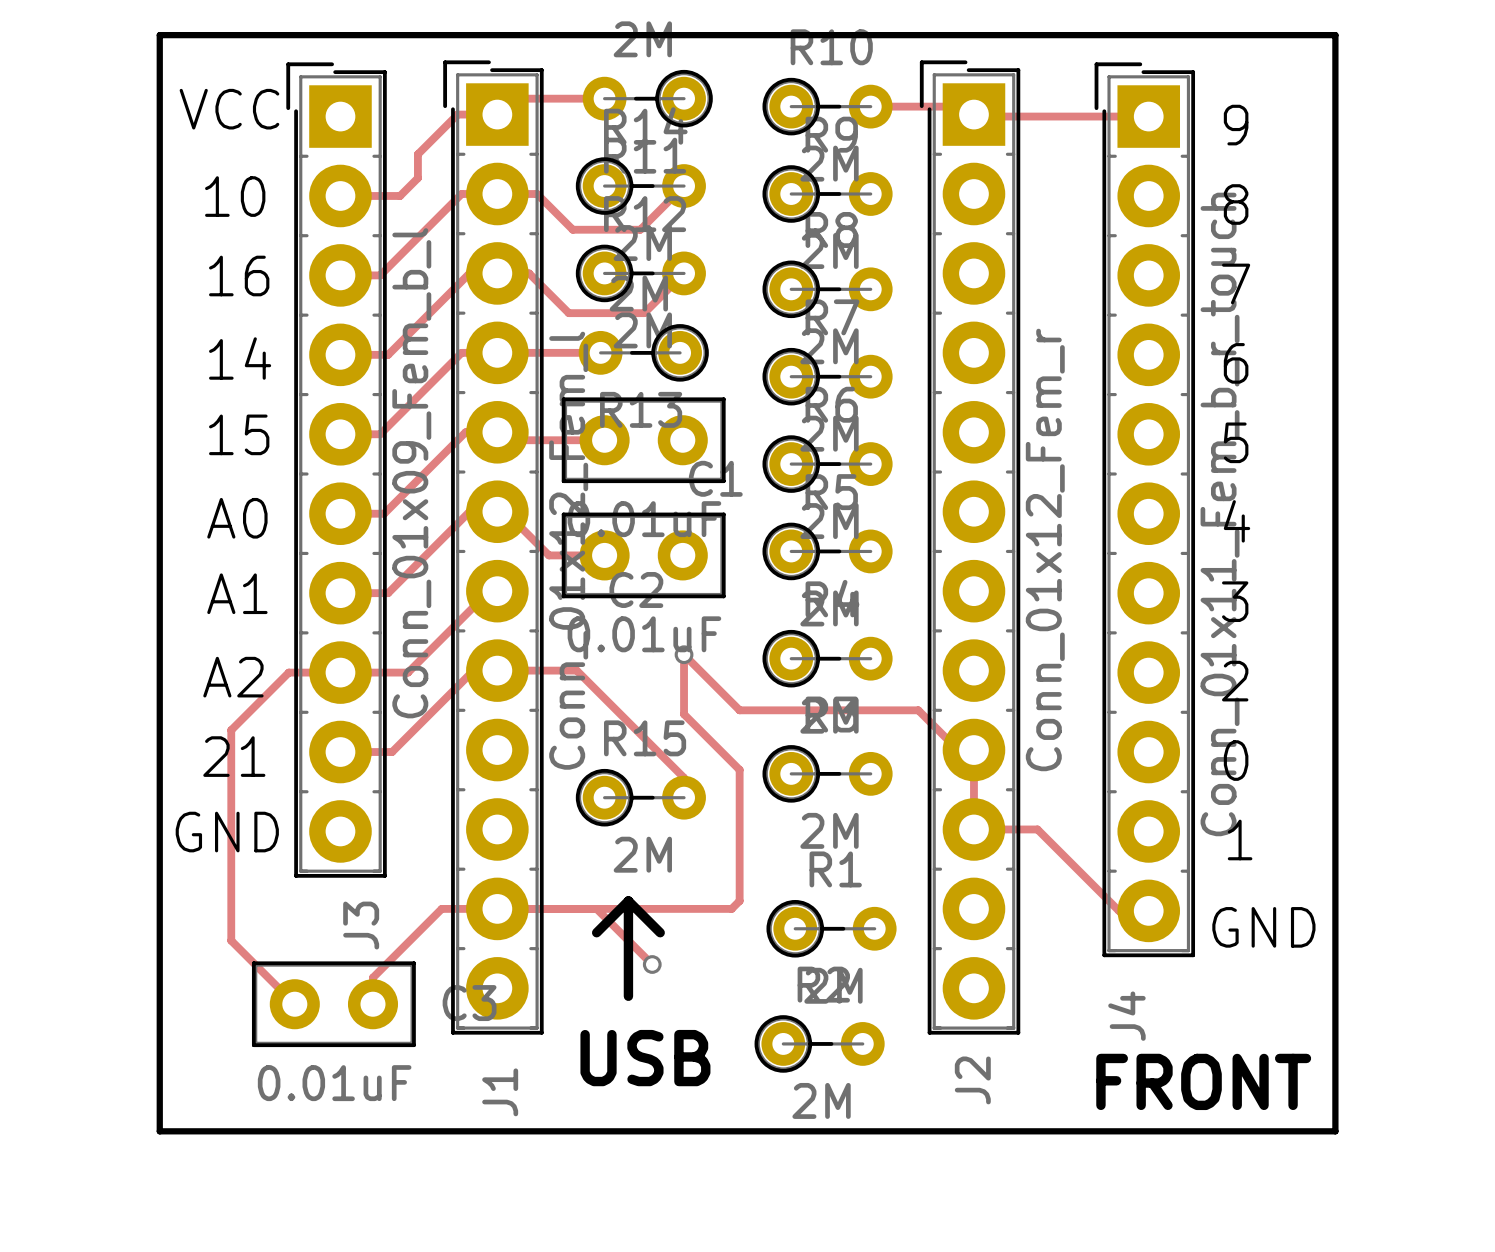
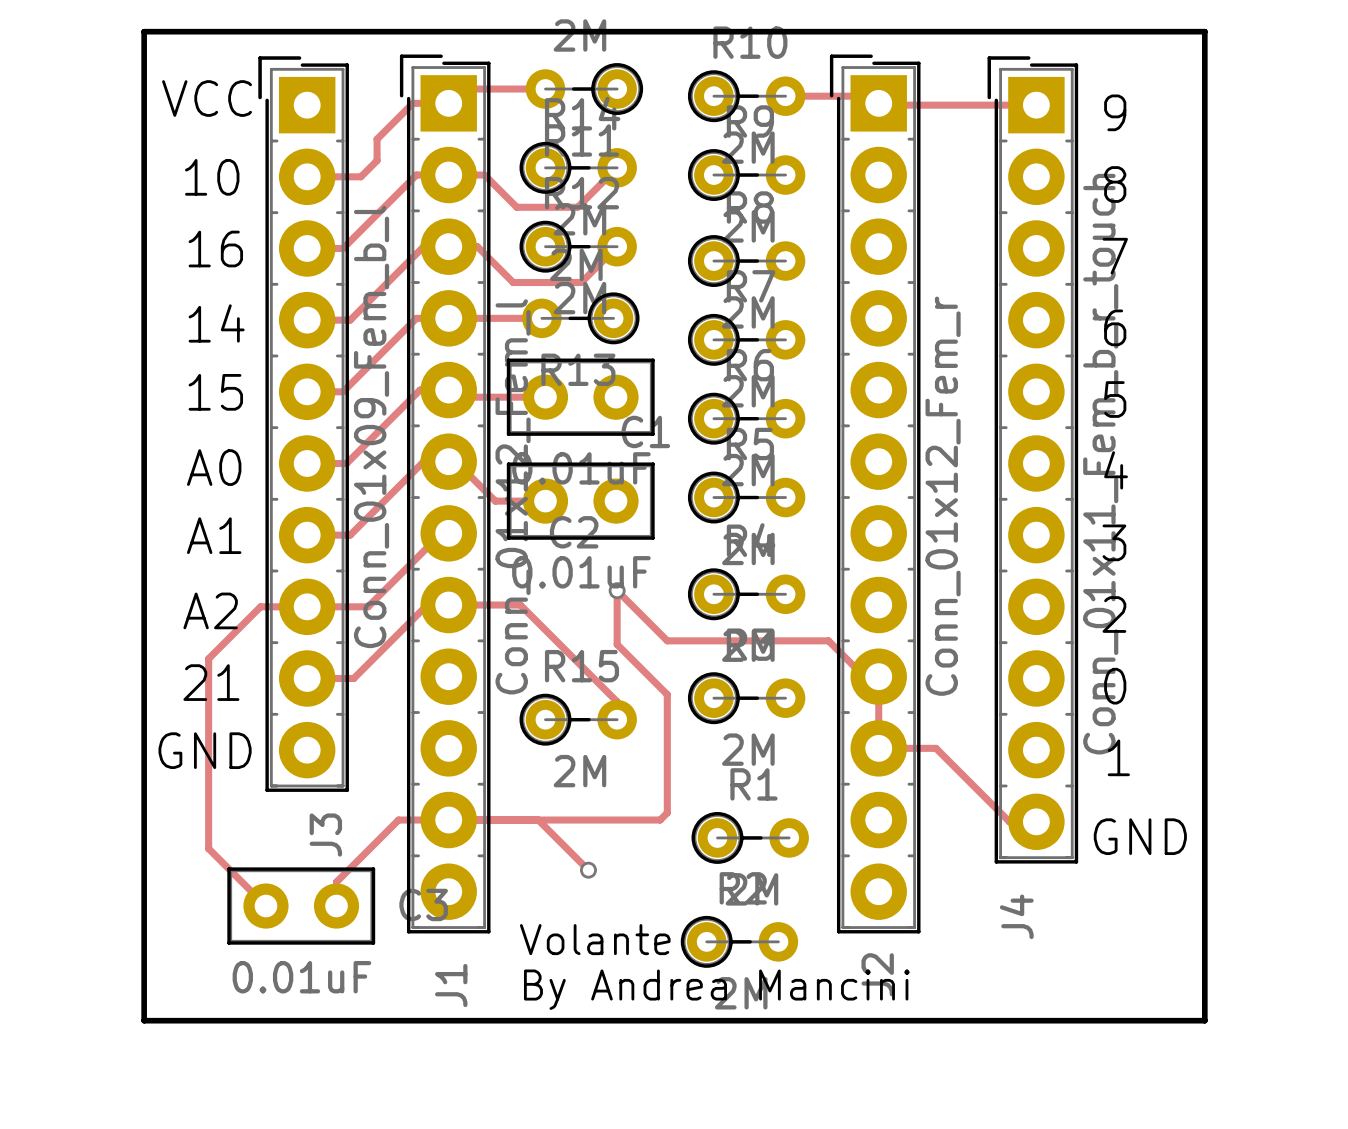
line: (628, 900) (660, 932) -> none
line: (628, 900) (596, 932) -> none
line: (628, 900) (628, 996) -> none
text: none -> Volante (595, 939)
text: USB (645, 1058) -> none
text: FRONT (1203, 1081) -> none
text: none -> By Andrea Mancini (716, 989)

